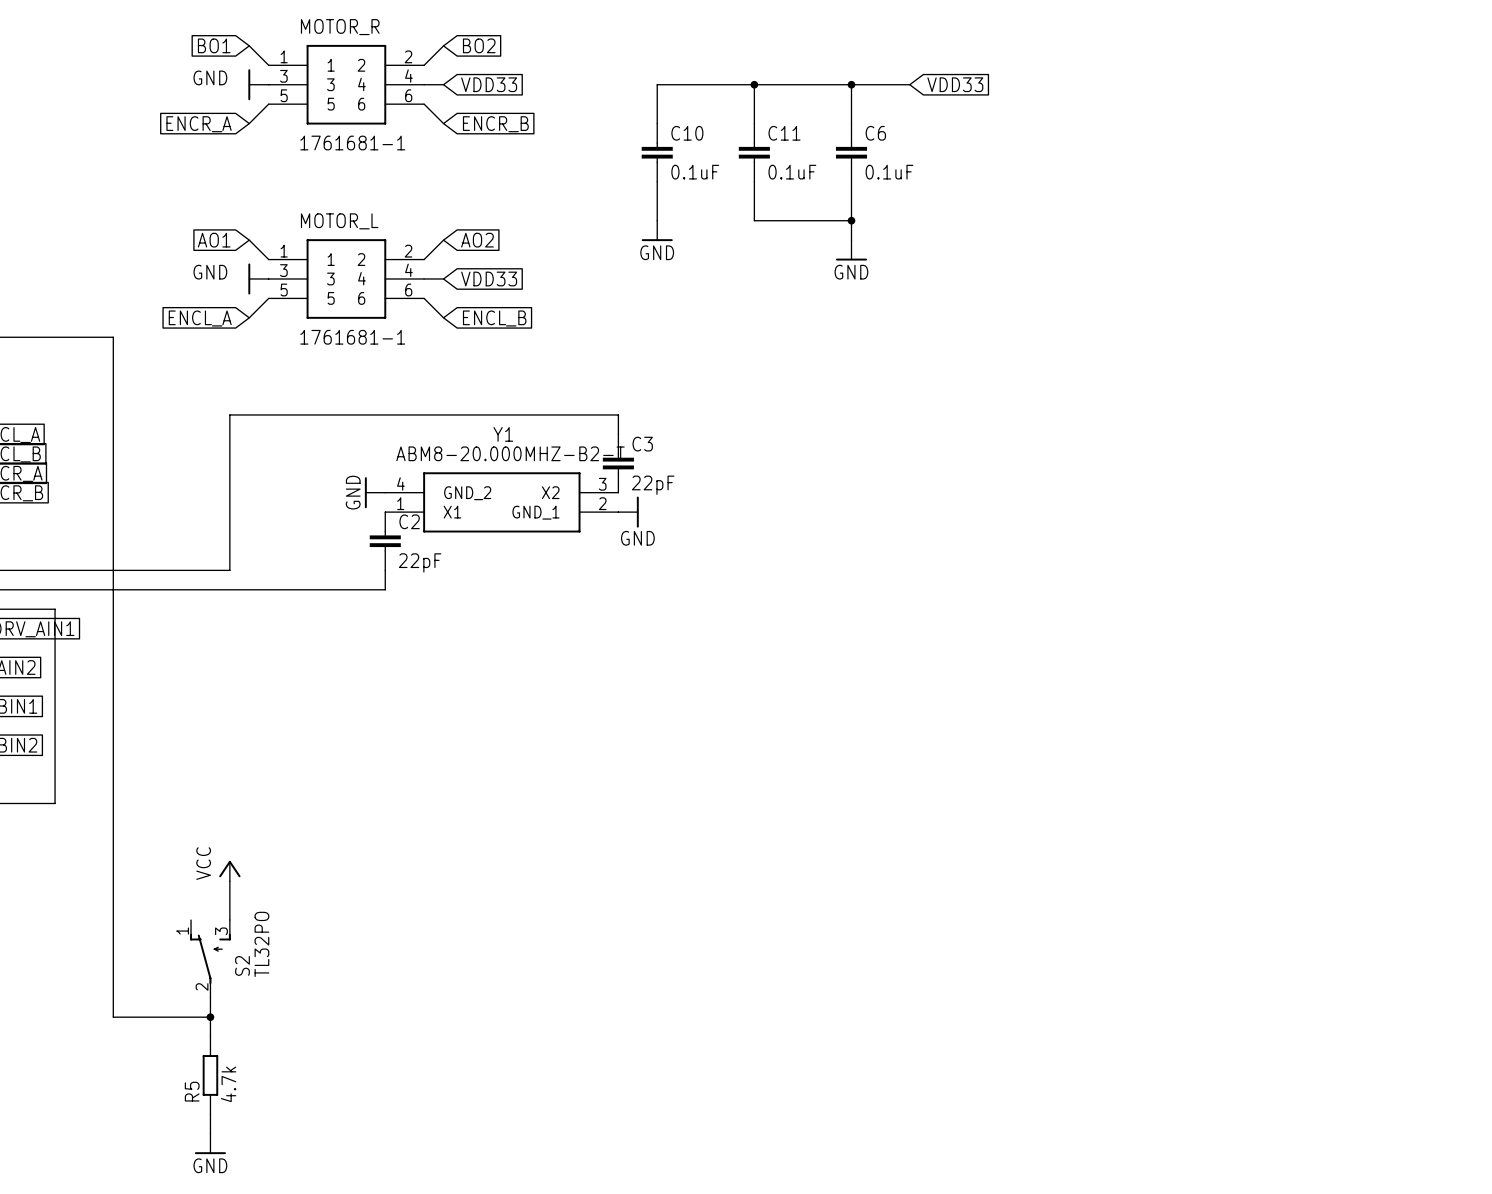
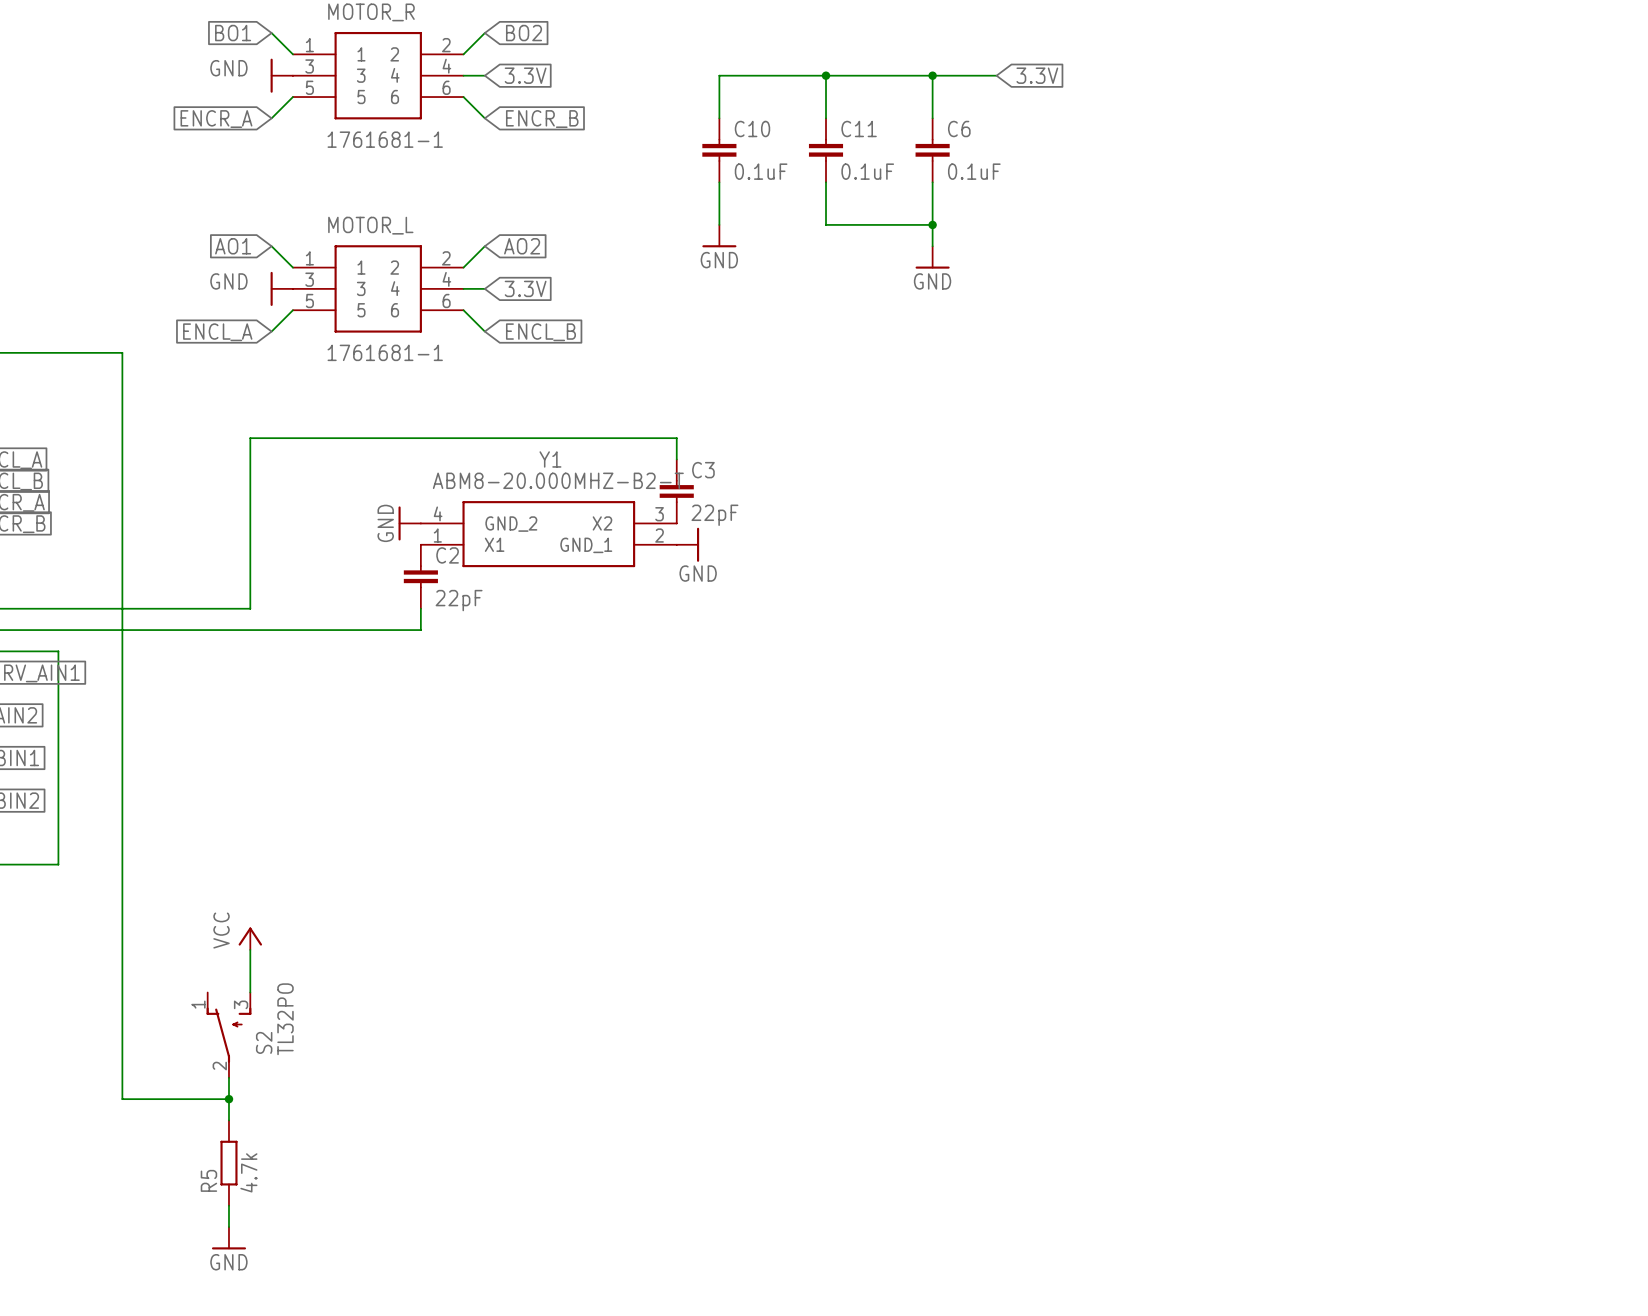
global label: VDD33 (489, 84) -> 3.3V (525, 75)
global label: VDD33 (955, 84) -> 3.3V (1037, 75)
global label: VDD33 (489, 278) -> 3.3V (525, 288)

